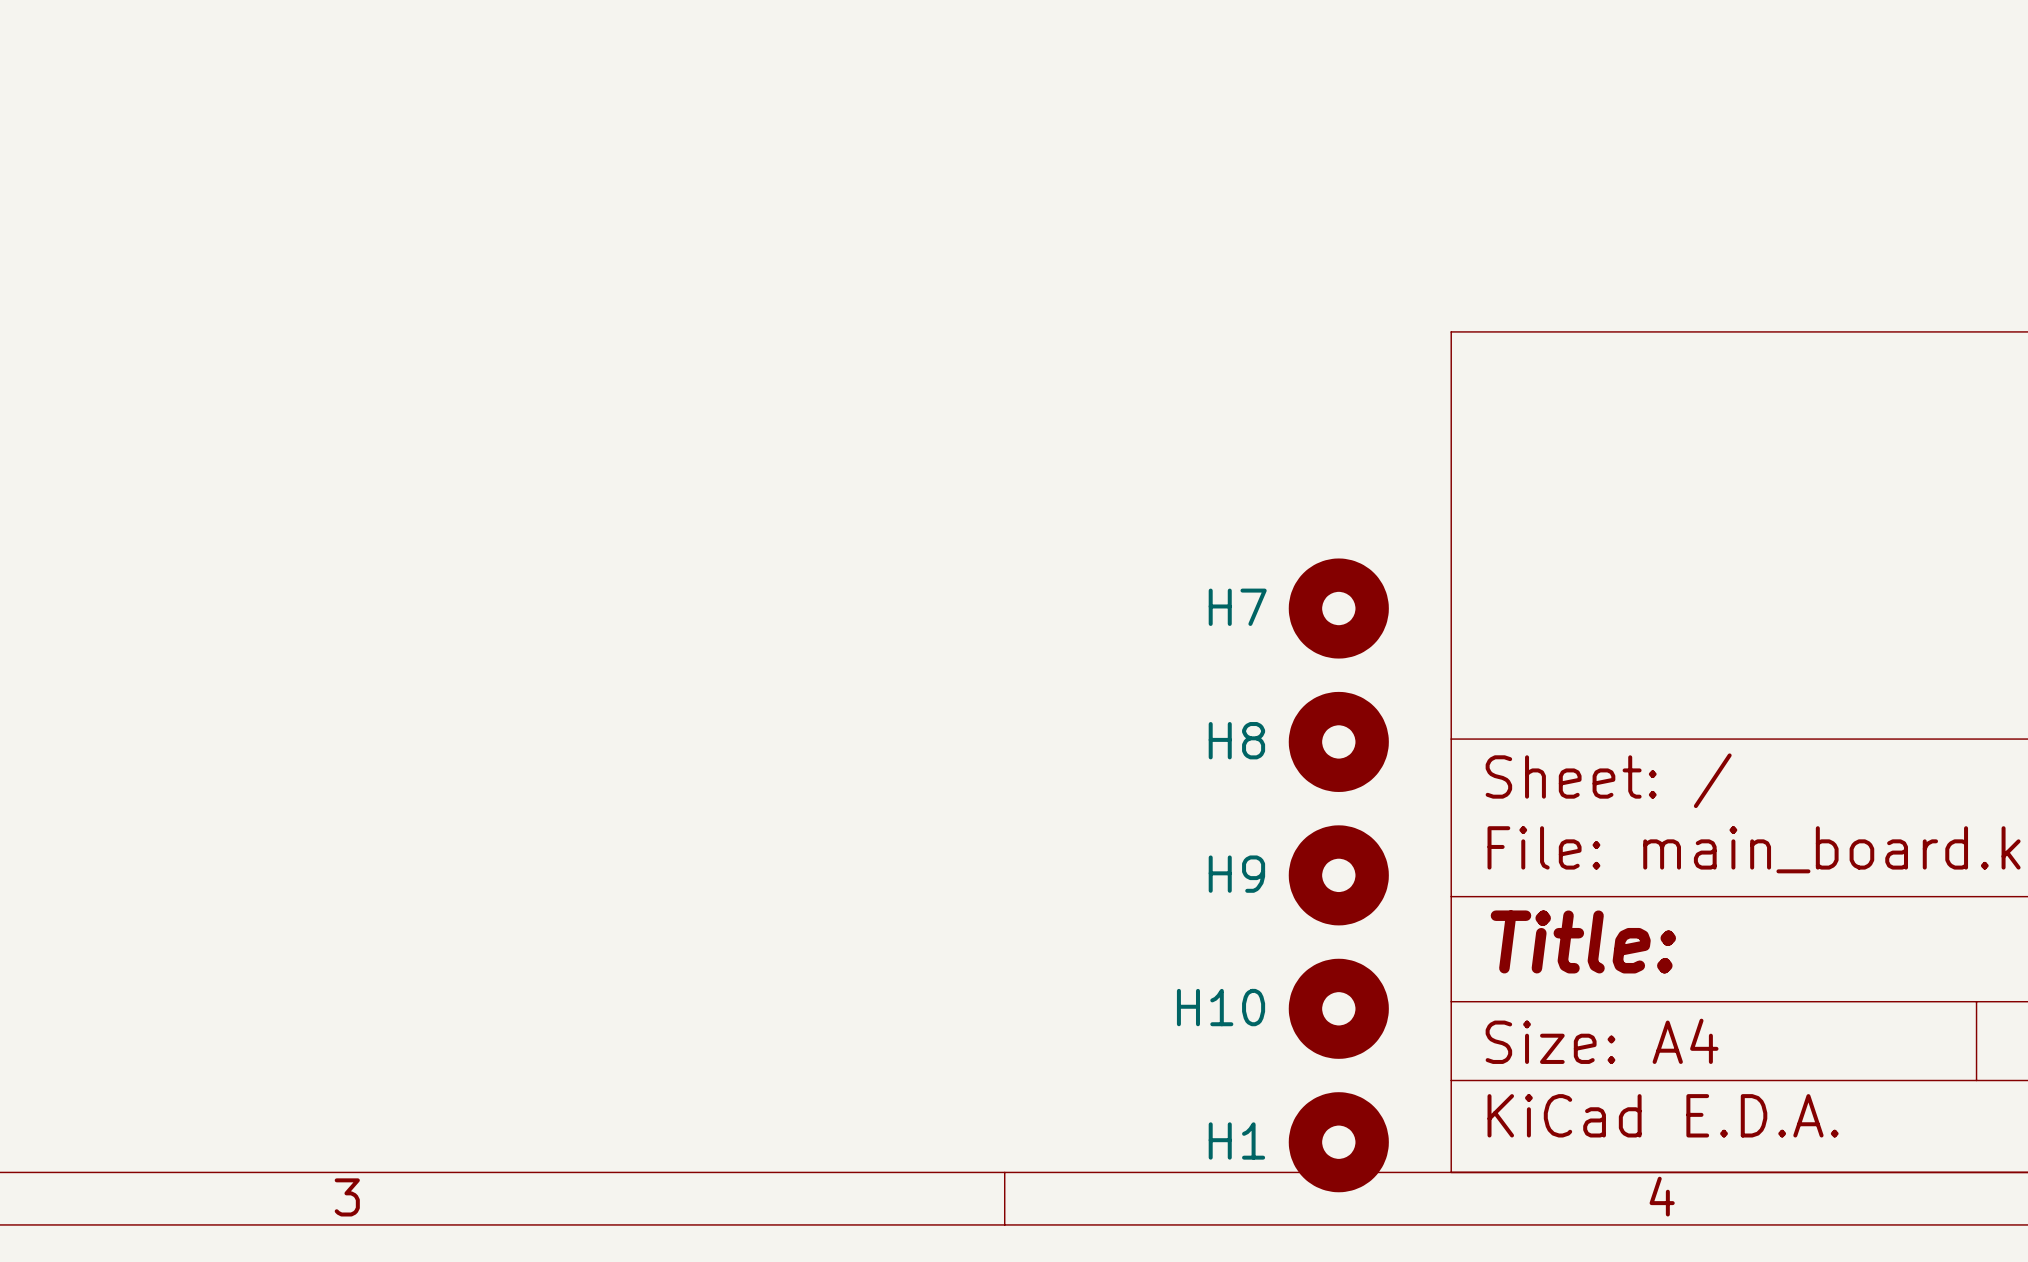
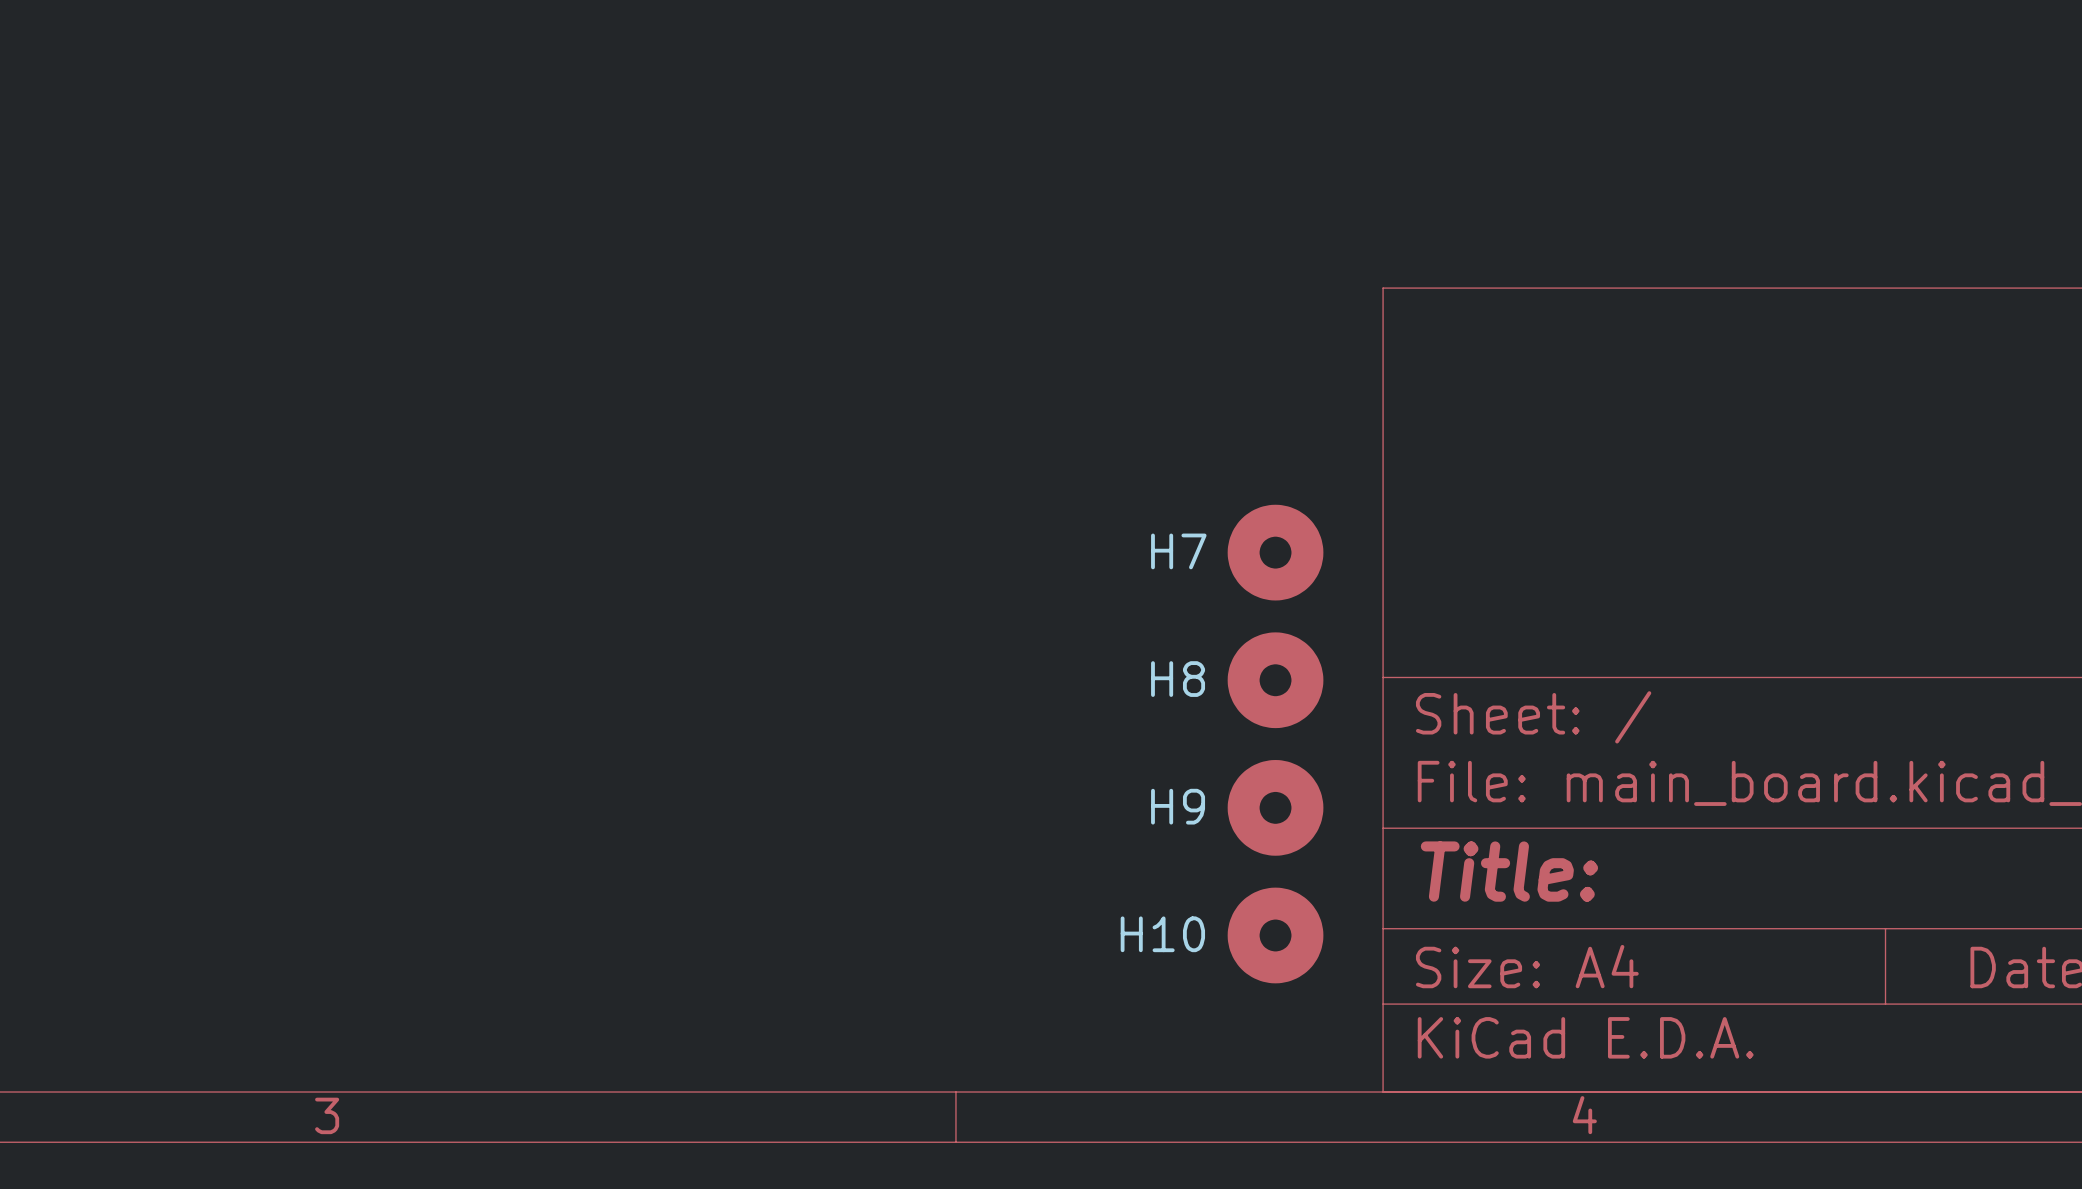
H1: (1338, 1142) -> none

